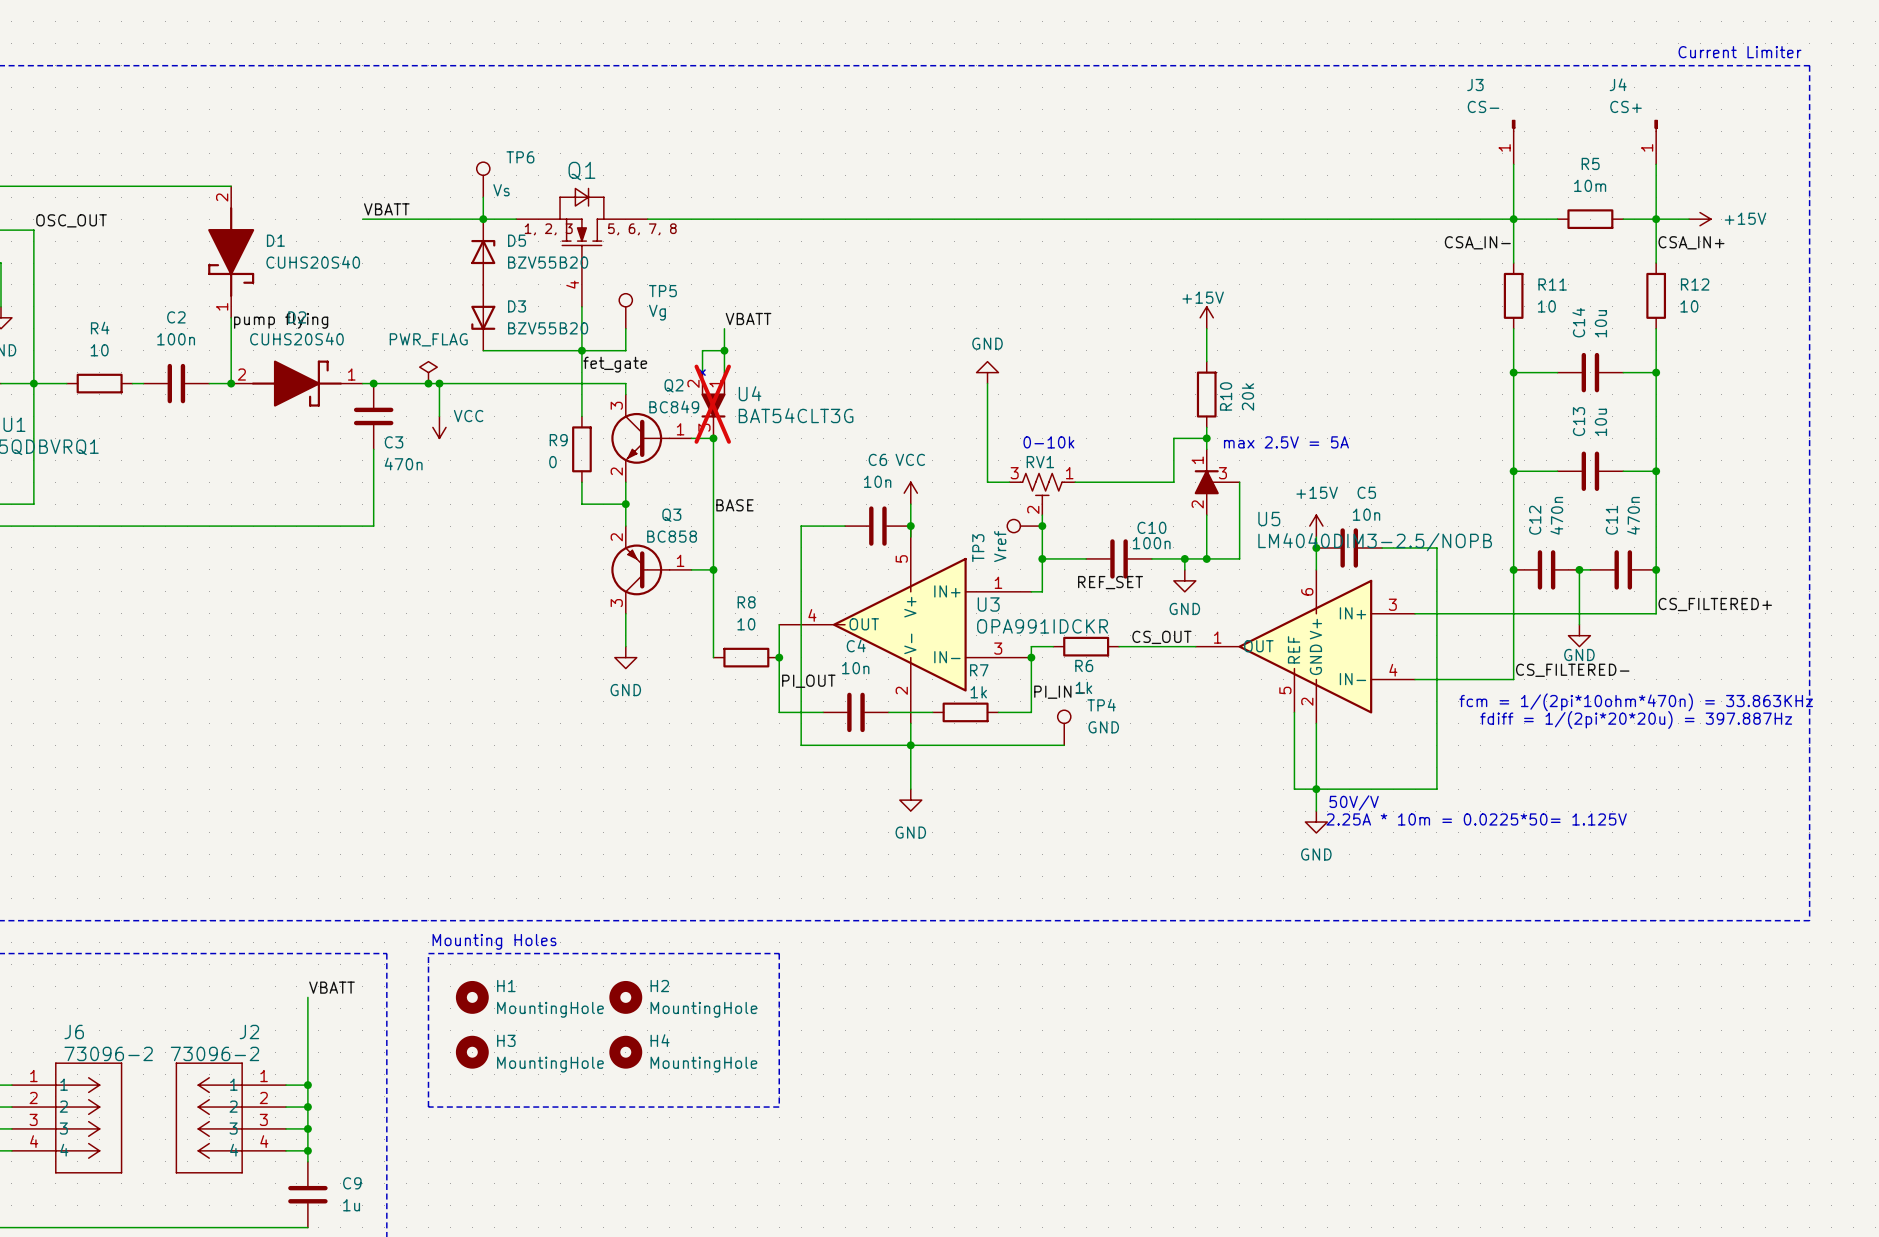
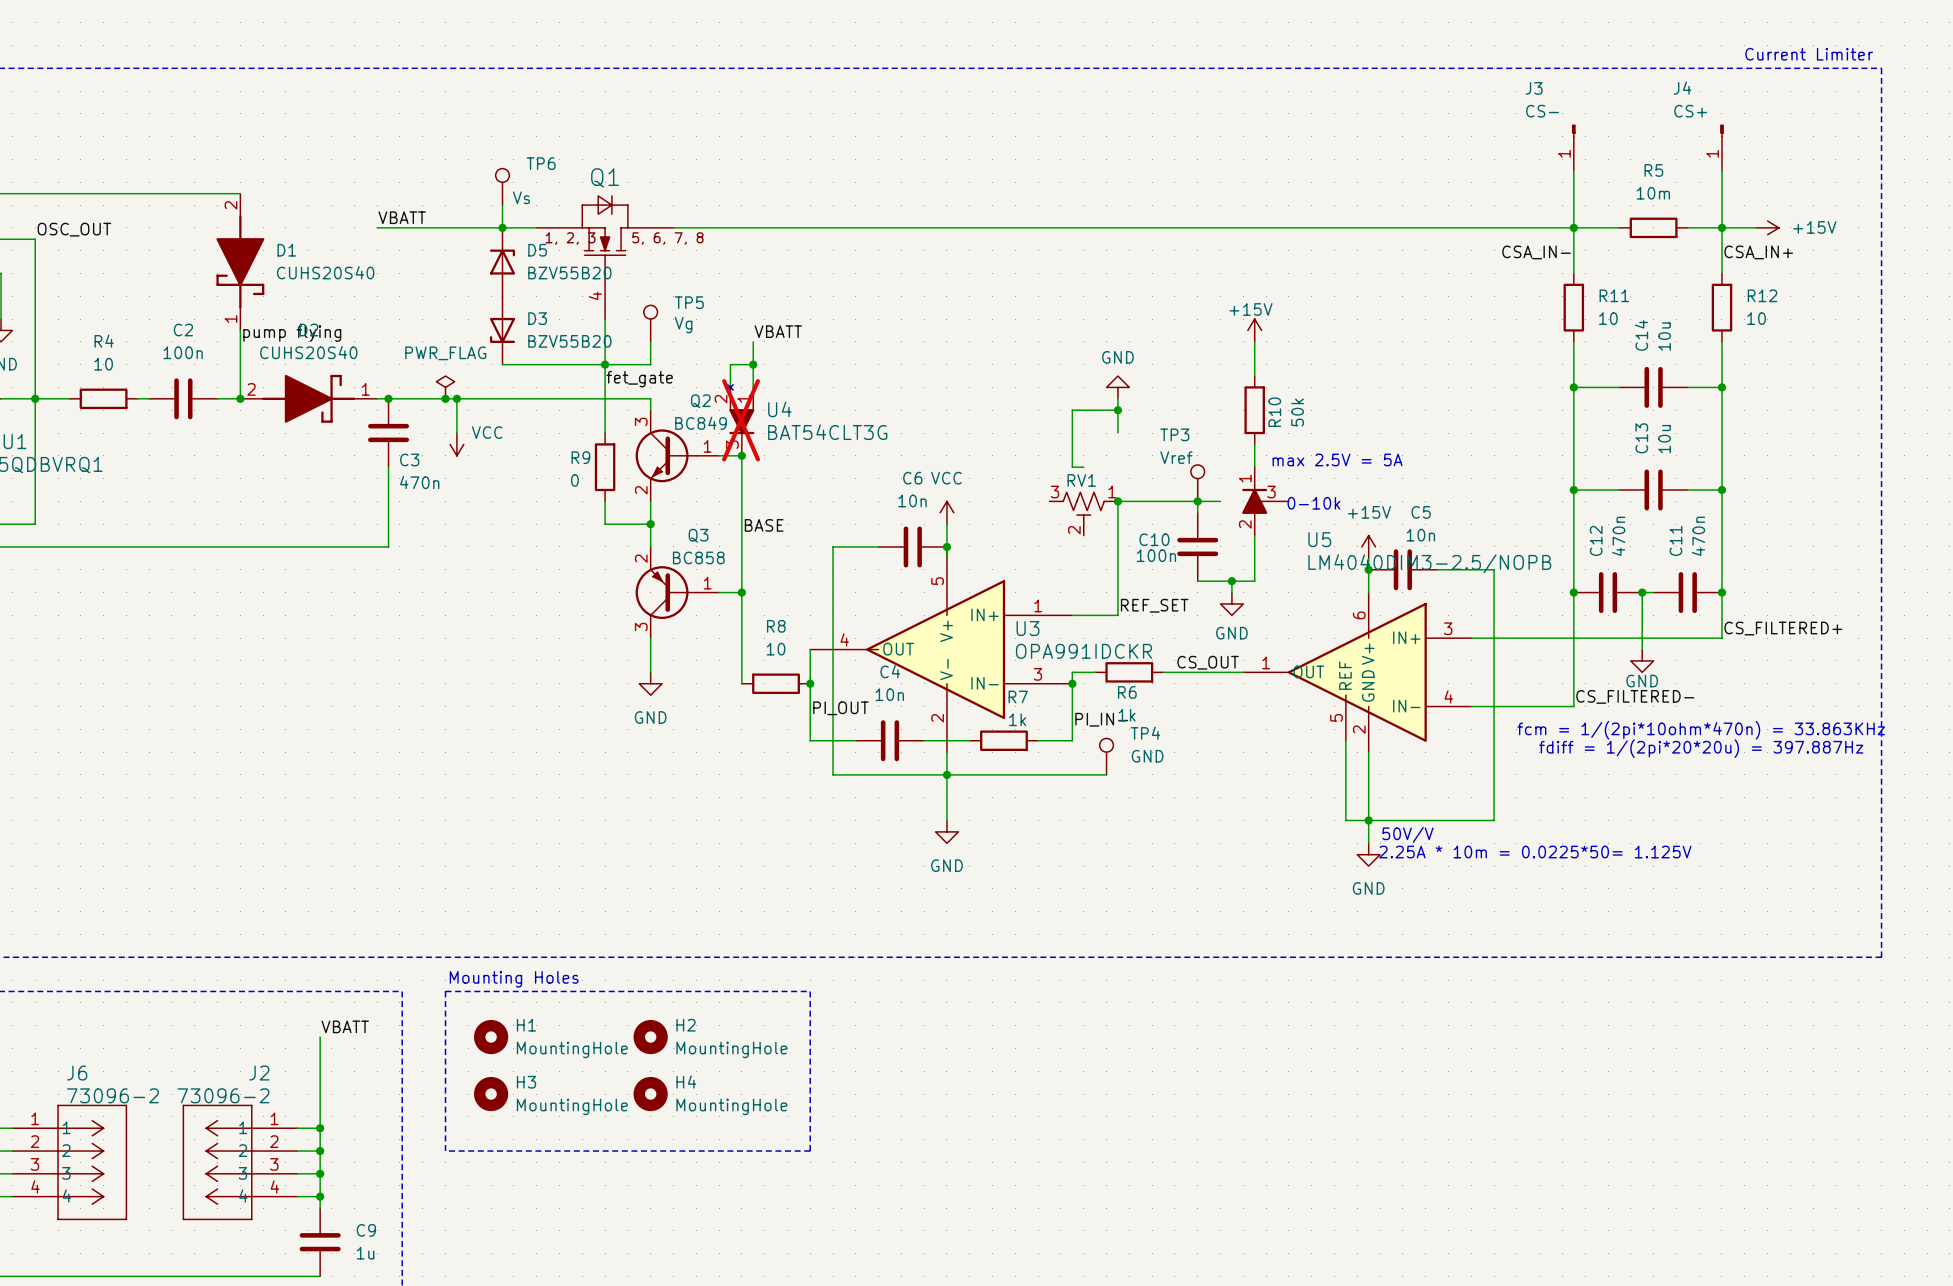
power symbol position: GND (987, 372) -> GND (1117, 387)
wire: (987, 383) (987, 482) (1009, 482) -> none
wire: none -> (1117, 398) (1117, 433)
wire: none -> (1117, 410) (1072, 410) (1072, 467) (1083, 467)
junction: none -> (1117, 410)
R10 value: 20k (1247, 396) -> 50k (1297, 412)
wire: (1206, 438) (1173, 438) (1173, 482) -> none
junction: (1206, 438) -> none
text: 0-10k (1048, 442) -> none
junction: none -> (1117, 501)
wire: none -> (1197, 501) (1197, 512)
junction: none -> (1197, 501)
wire: (1239, 482) (1239, 558) (1206, 558) -> none
text: none -> 0-10k (1313, 503)
wire: (1042, 515) (1042, 591) -> (1117, 501) (1117, 615) (1083, 615)
TP3 rotation: 0° (1013, 526) -> 90° clockwise (1197, 471)
TP3 position: (1024, 526) -> (1197, 483)
junction: (1042, 526) -> none
C10 name position: C10 (1151, 527) -> C10 (1154, 539)
C10 value position: 100n (1151, 543) -> 100n (1156, 555)
wire: (1042, 558) (1086, 558) -> none
junction: (1042, 558) -> none
C10 rotation: 0° (1119, 558) -> 90° clockwise (1197, 546)
C10 position: (1119, 558) -> (1197, 546)
junction: (1206, 558) -> none

